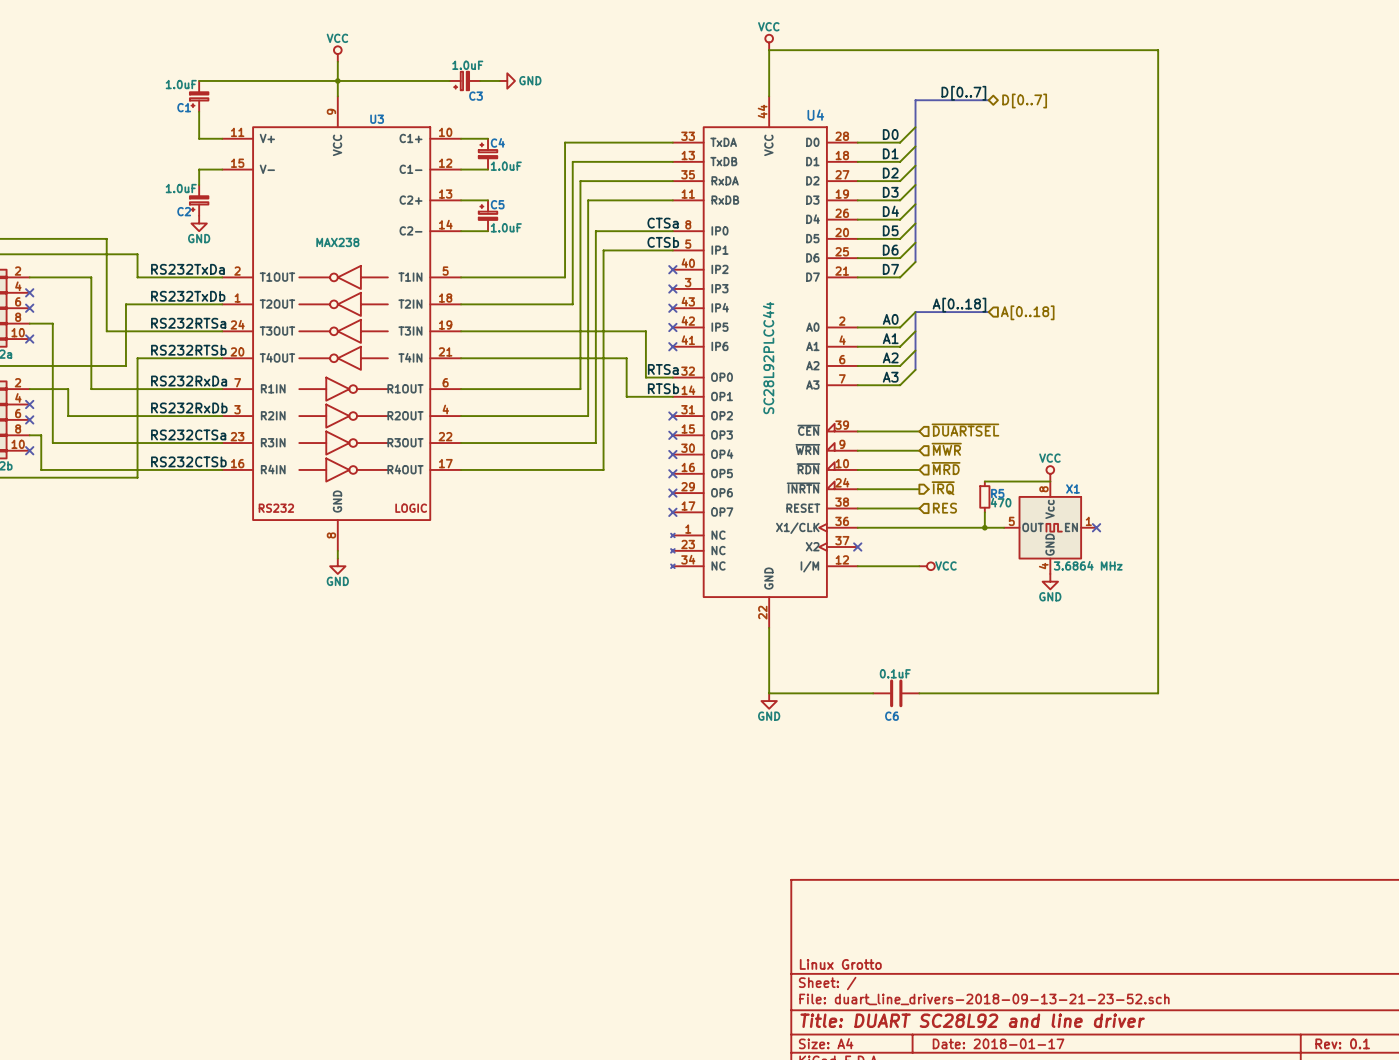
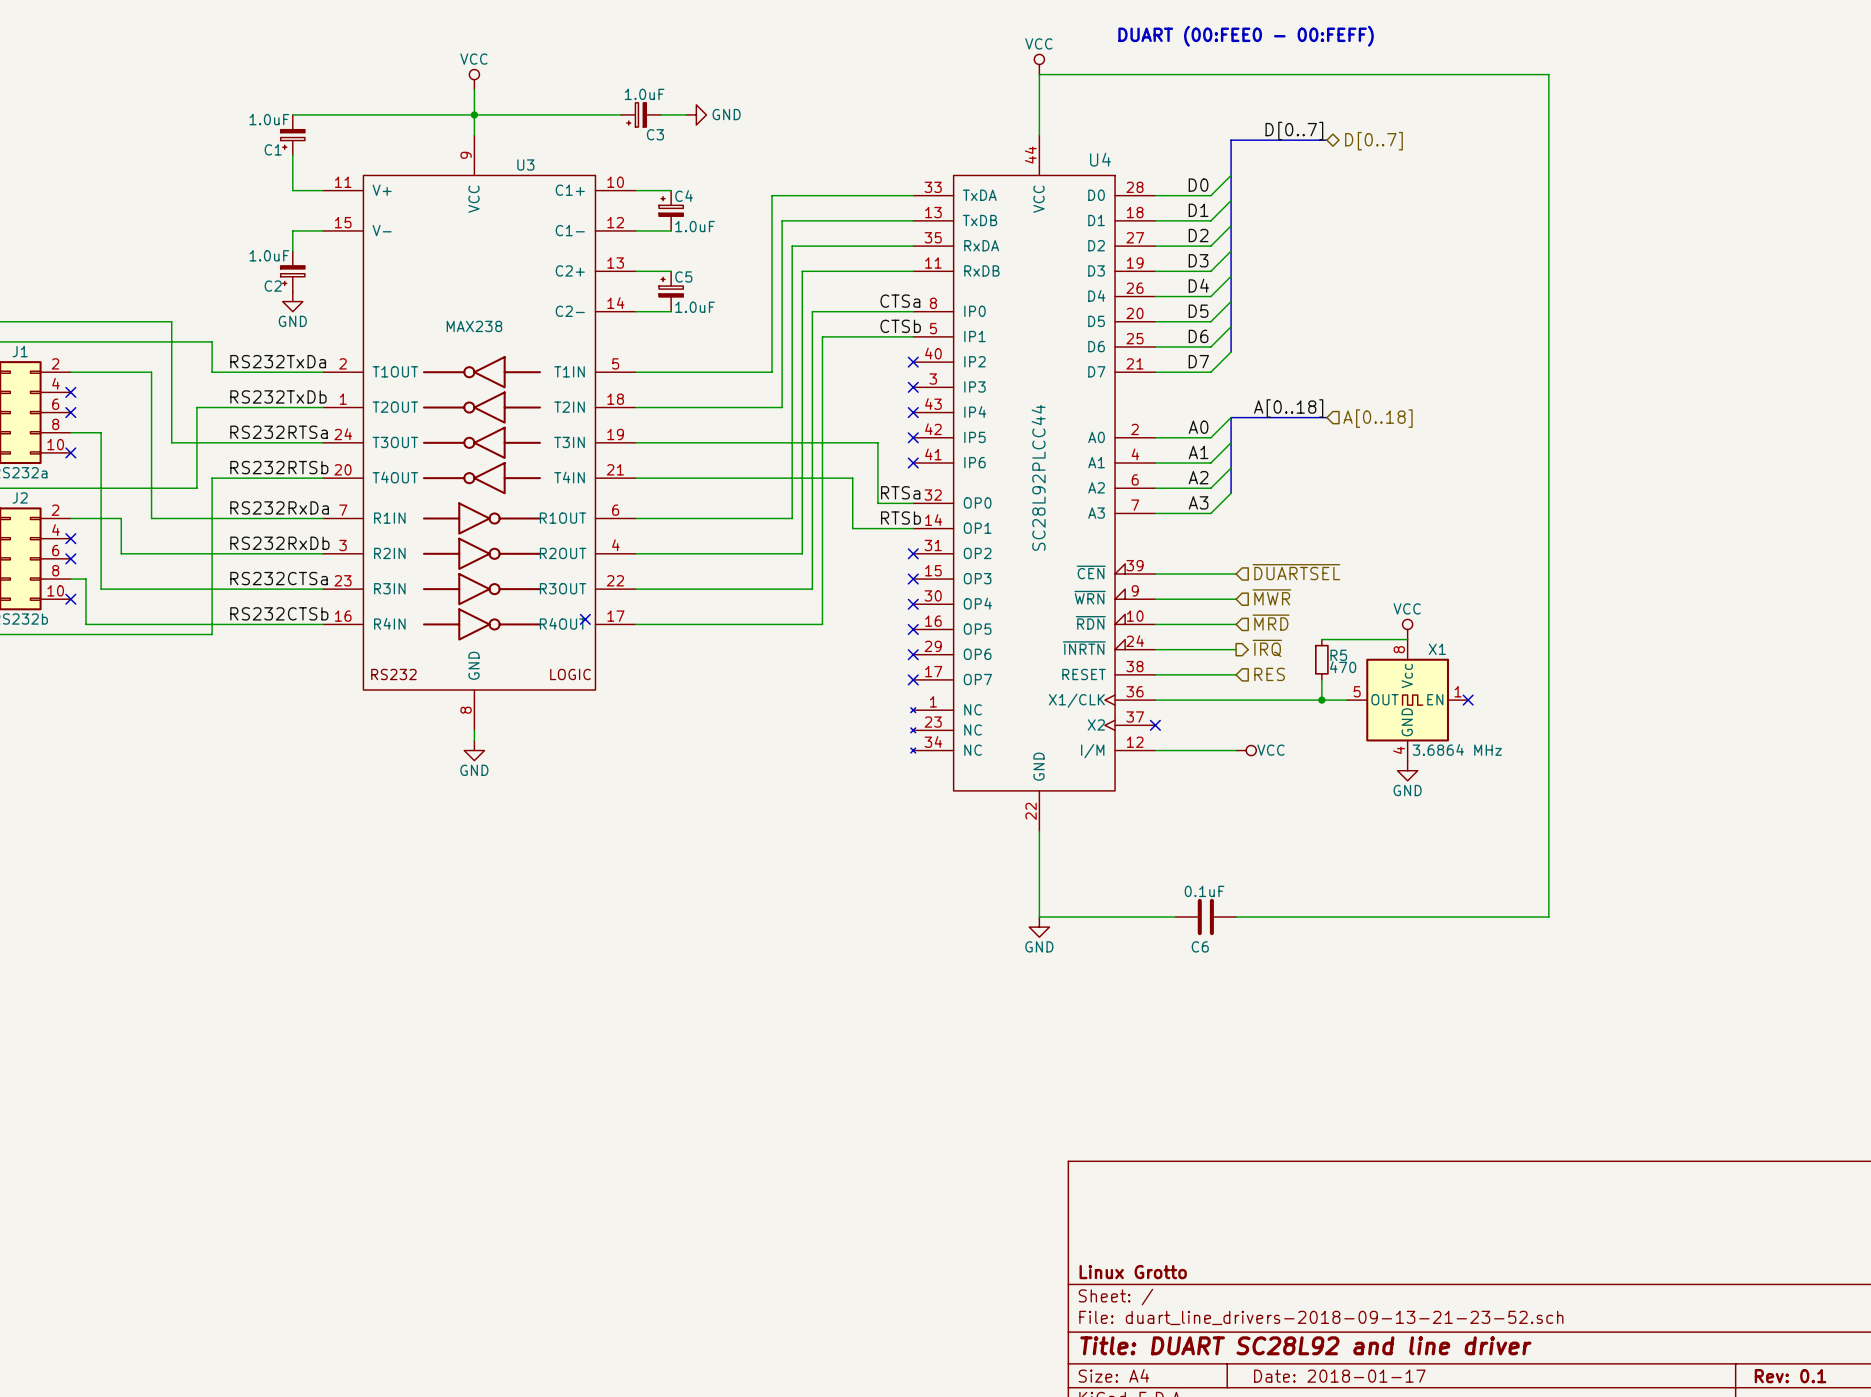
text: none -> DUART (00:FEE0 - 00:FEFF) (1246, 36)
no-connect mark: none -> (585, 619)

